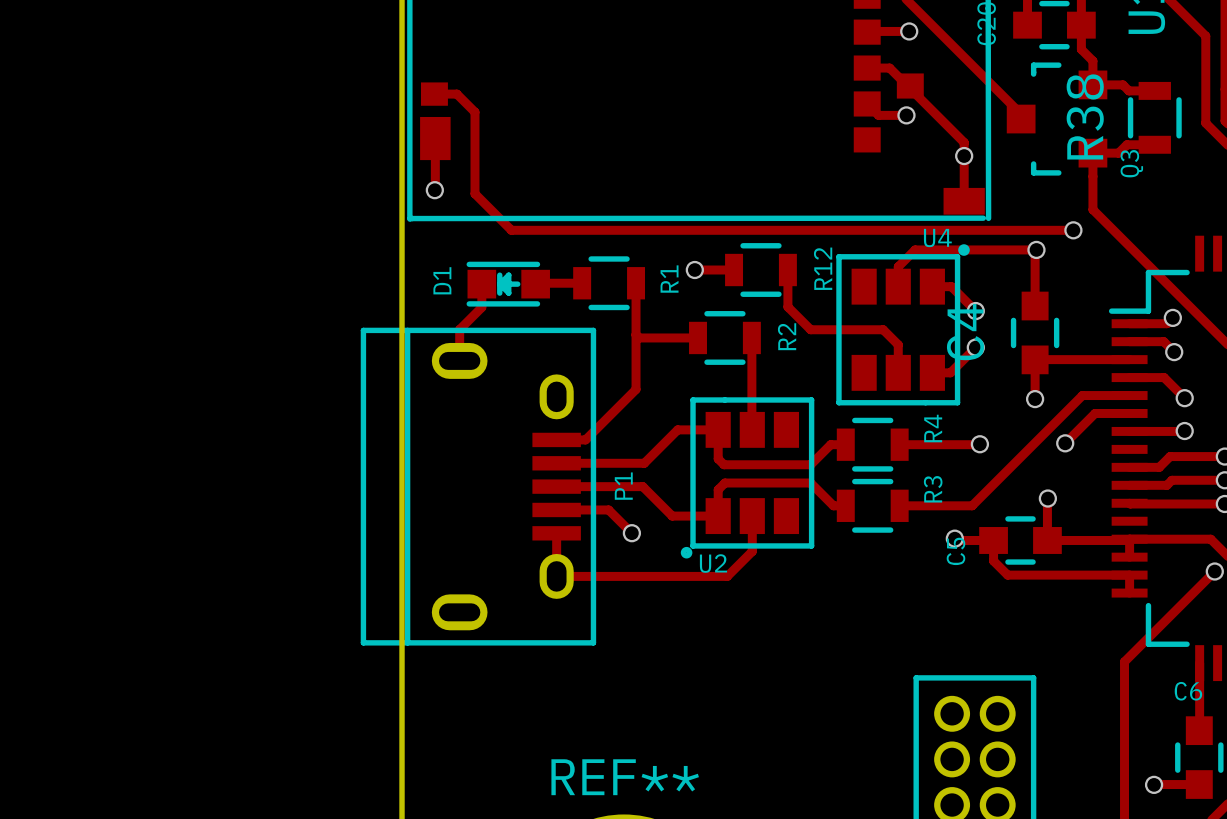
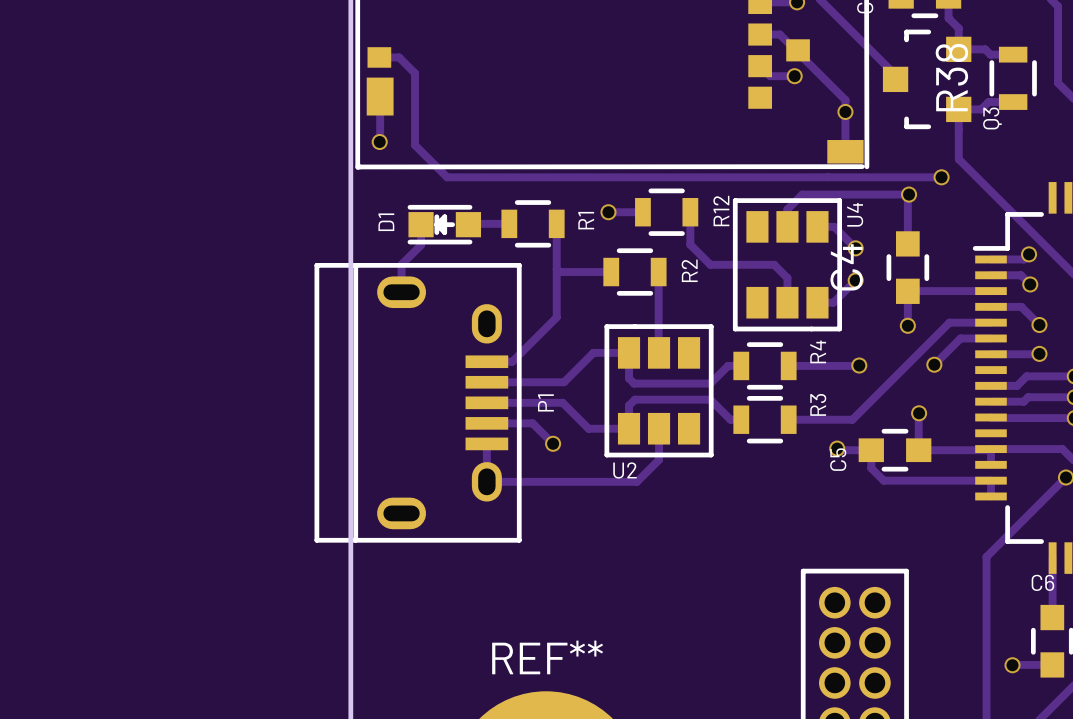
U4 name rotation: 0° (937, 238) -> 90° counterclockwise (855, 214)
U4 name position: U4 (937, 238) -> U4 (855, 214)
U4 footprint: [836, 244, 970, 406] -> [732, 198, 843, 332]
U2 footprint: [680, 397, 815, 559] -> [604, 324, 714, 458]

